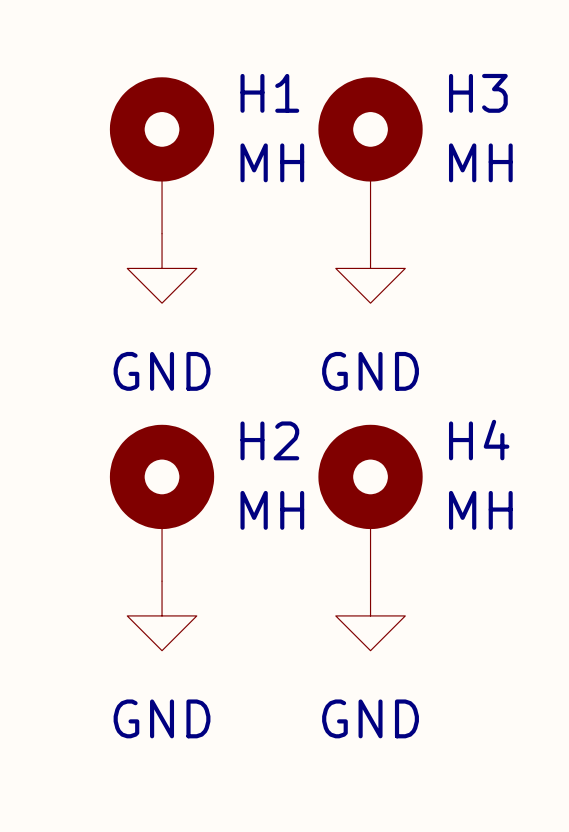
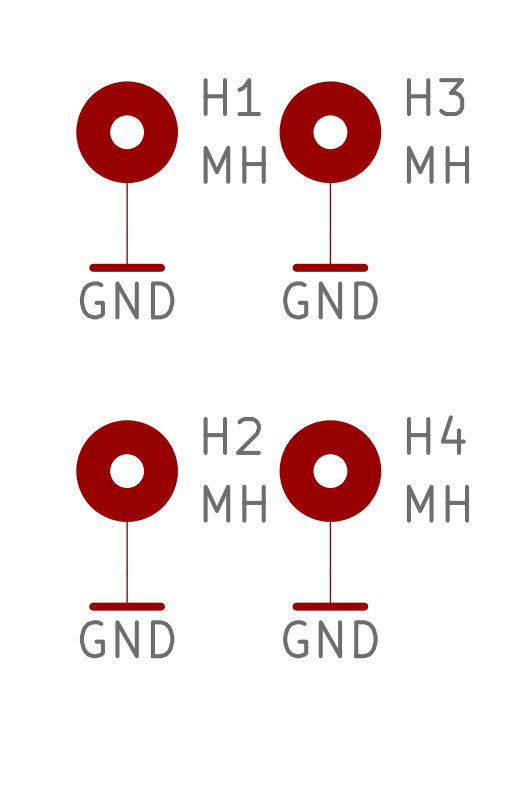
power symbol shape: [127, 233, 197, 304] -> [89, 233, 166, 272]
power symbol shape: [335, 233, 406, 304] -> [292, 233, 369, 272]
power symbol shape: [127, 581, 197, 651] -> [89, 572, 166, 611]
power symbol shape: [335, 581, 406, 651] -> [292, 572, 369, 611]

